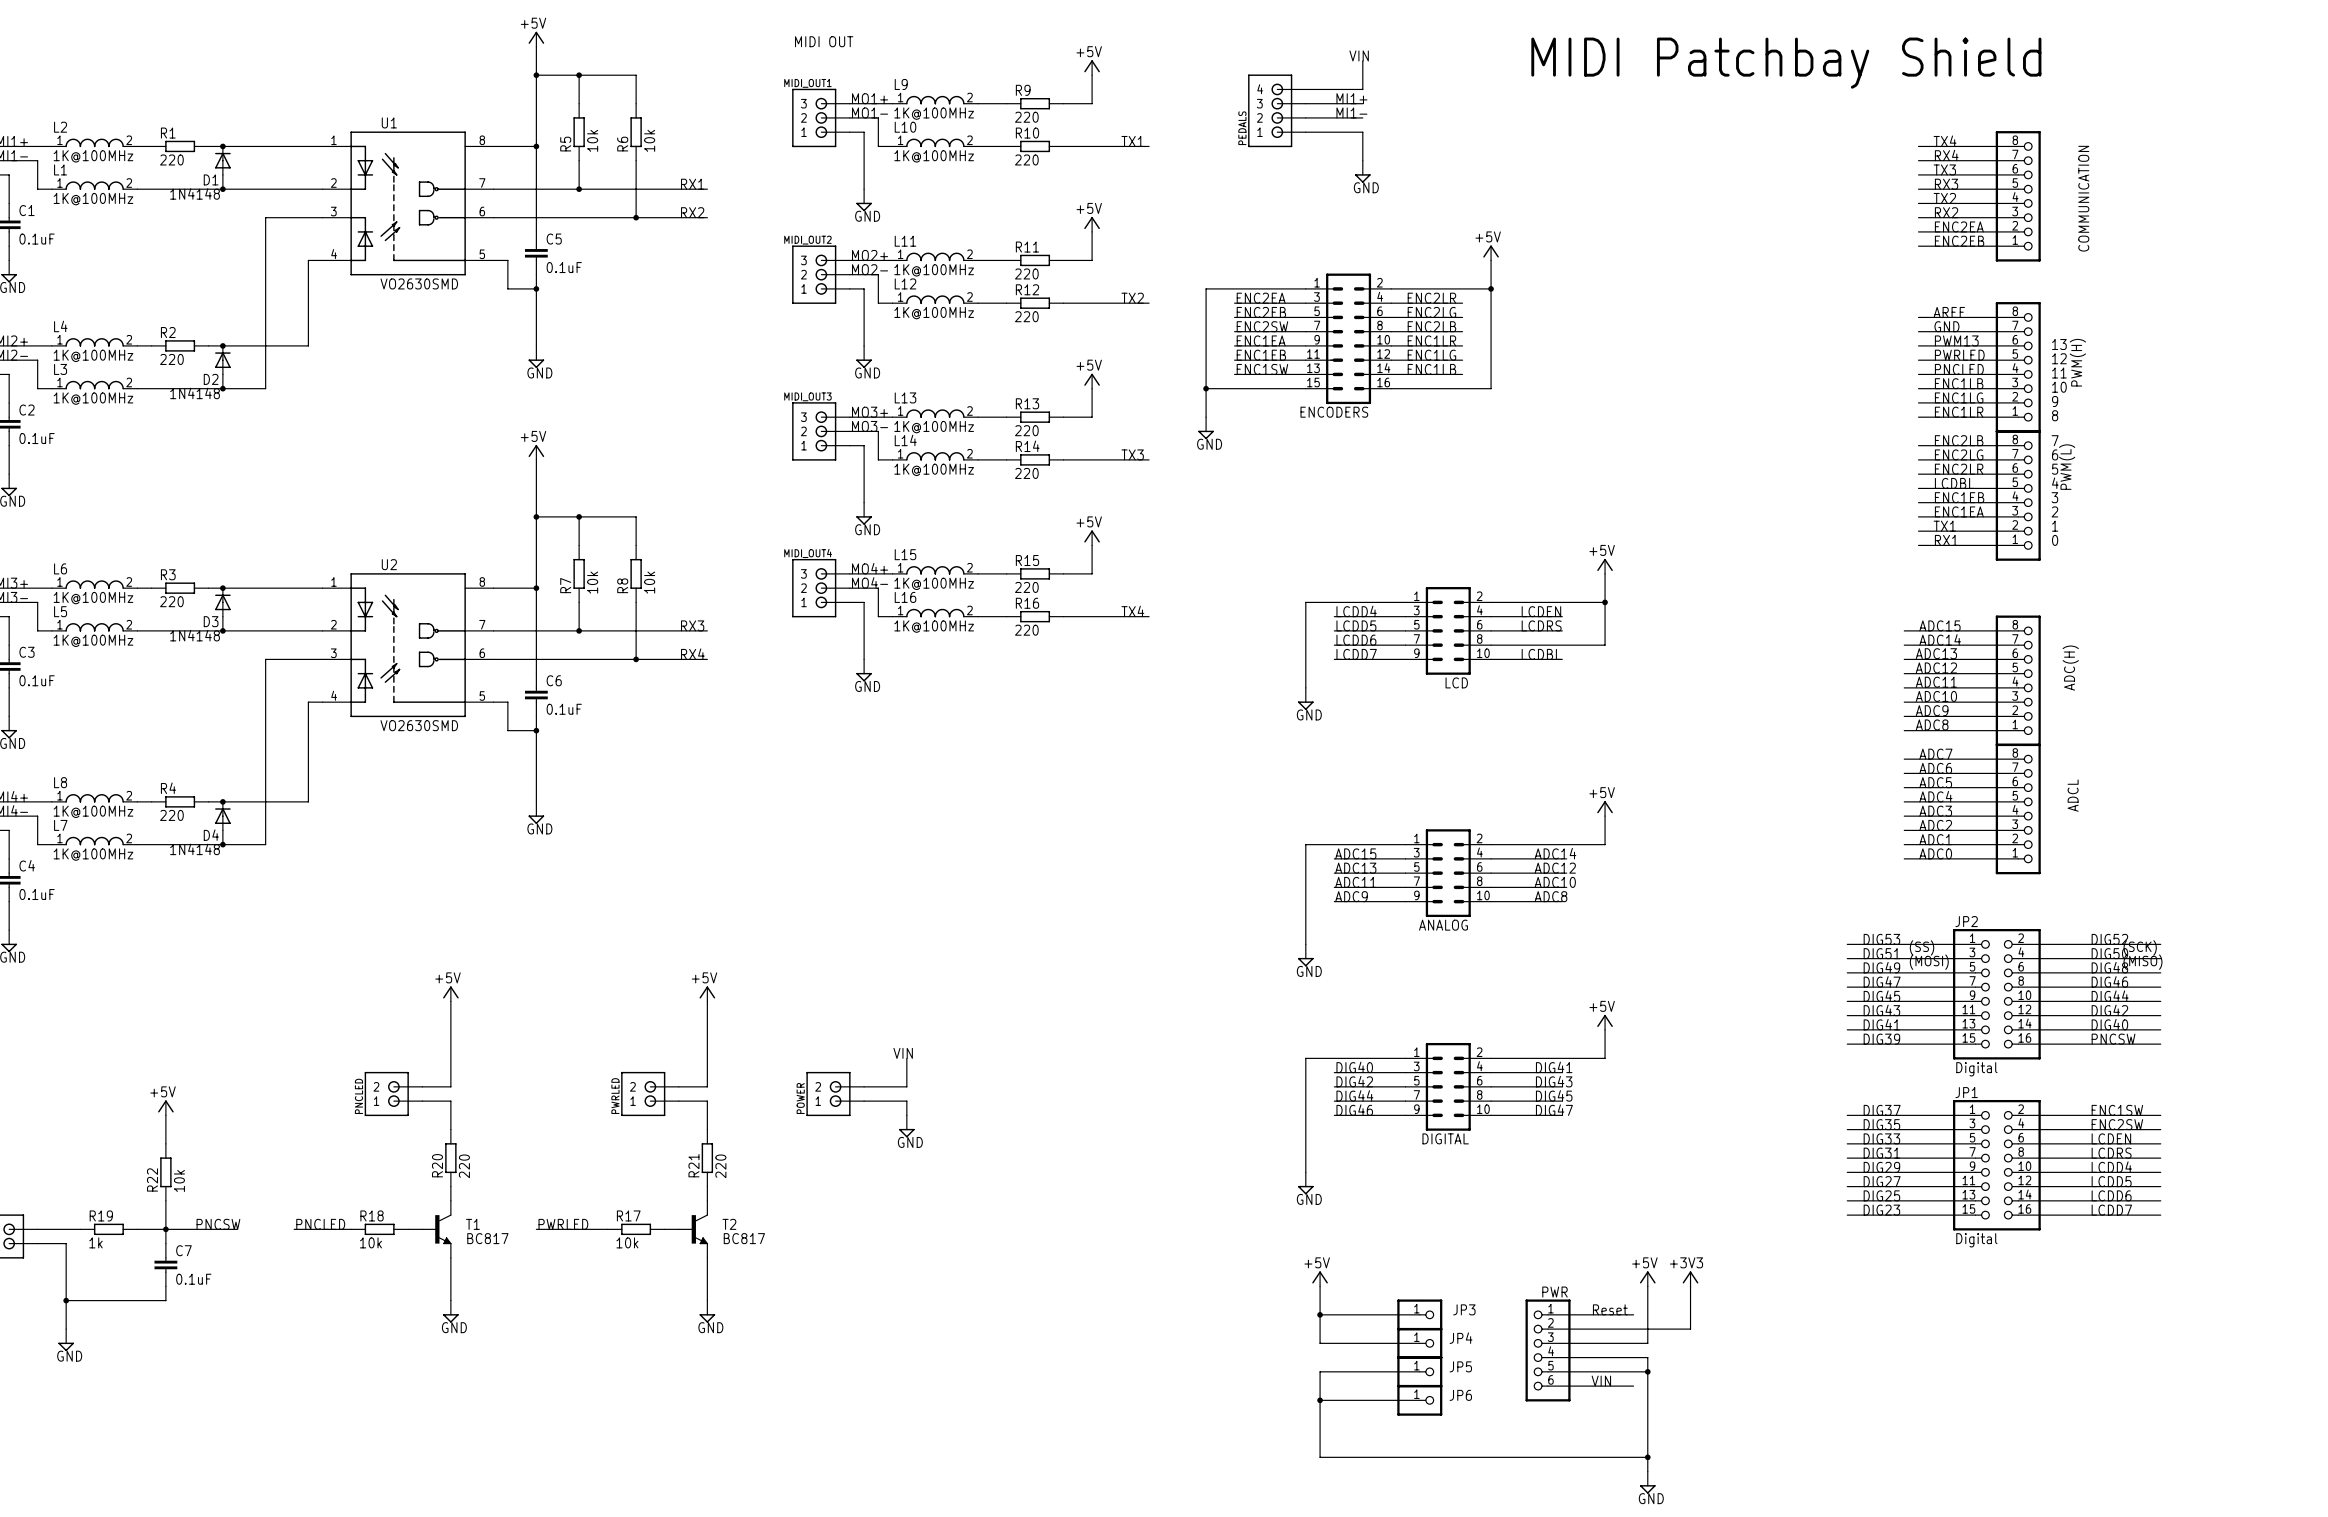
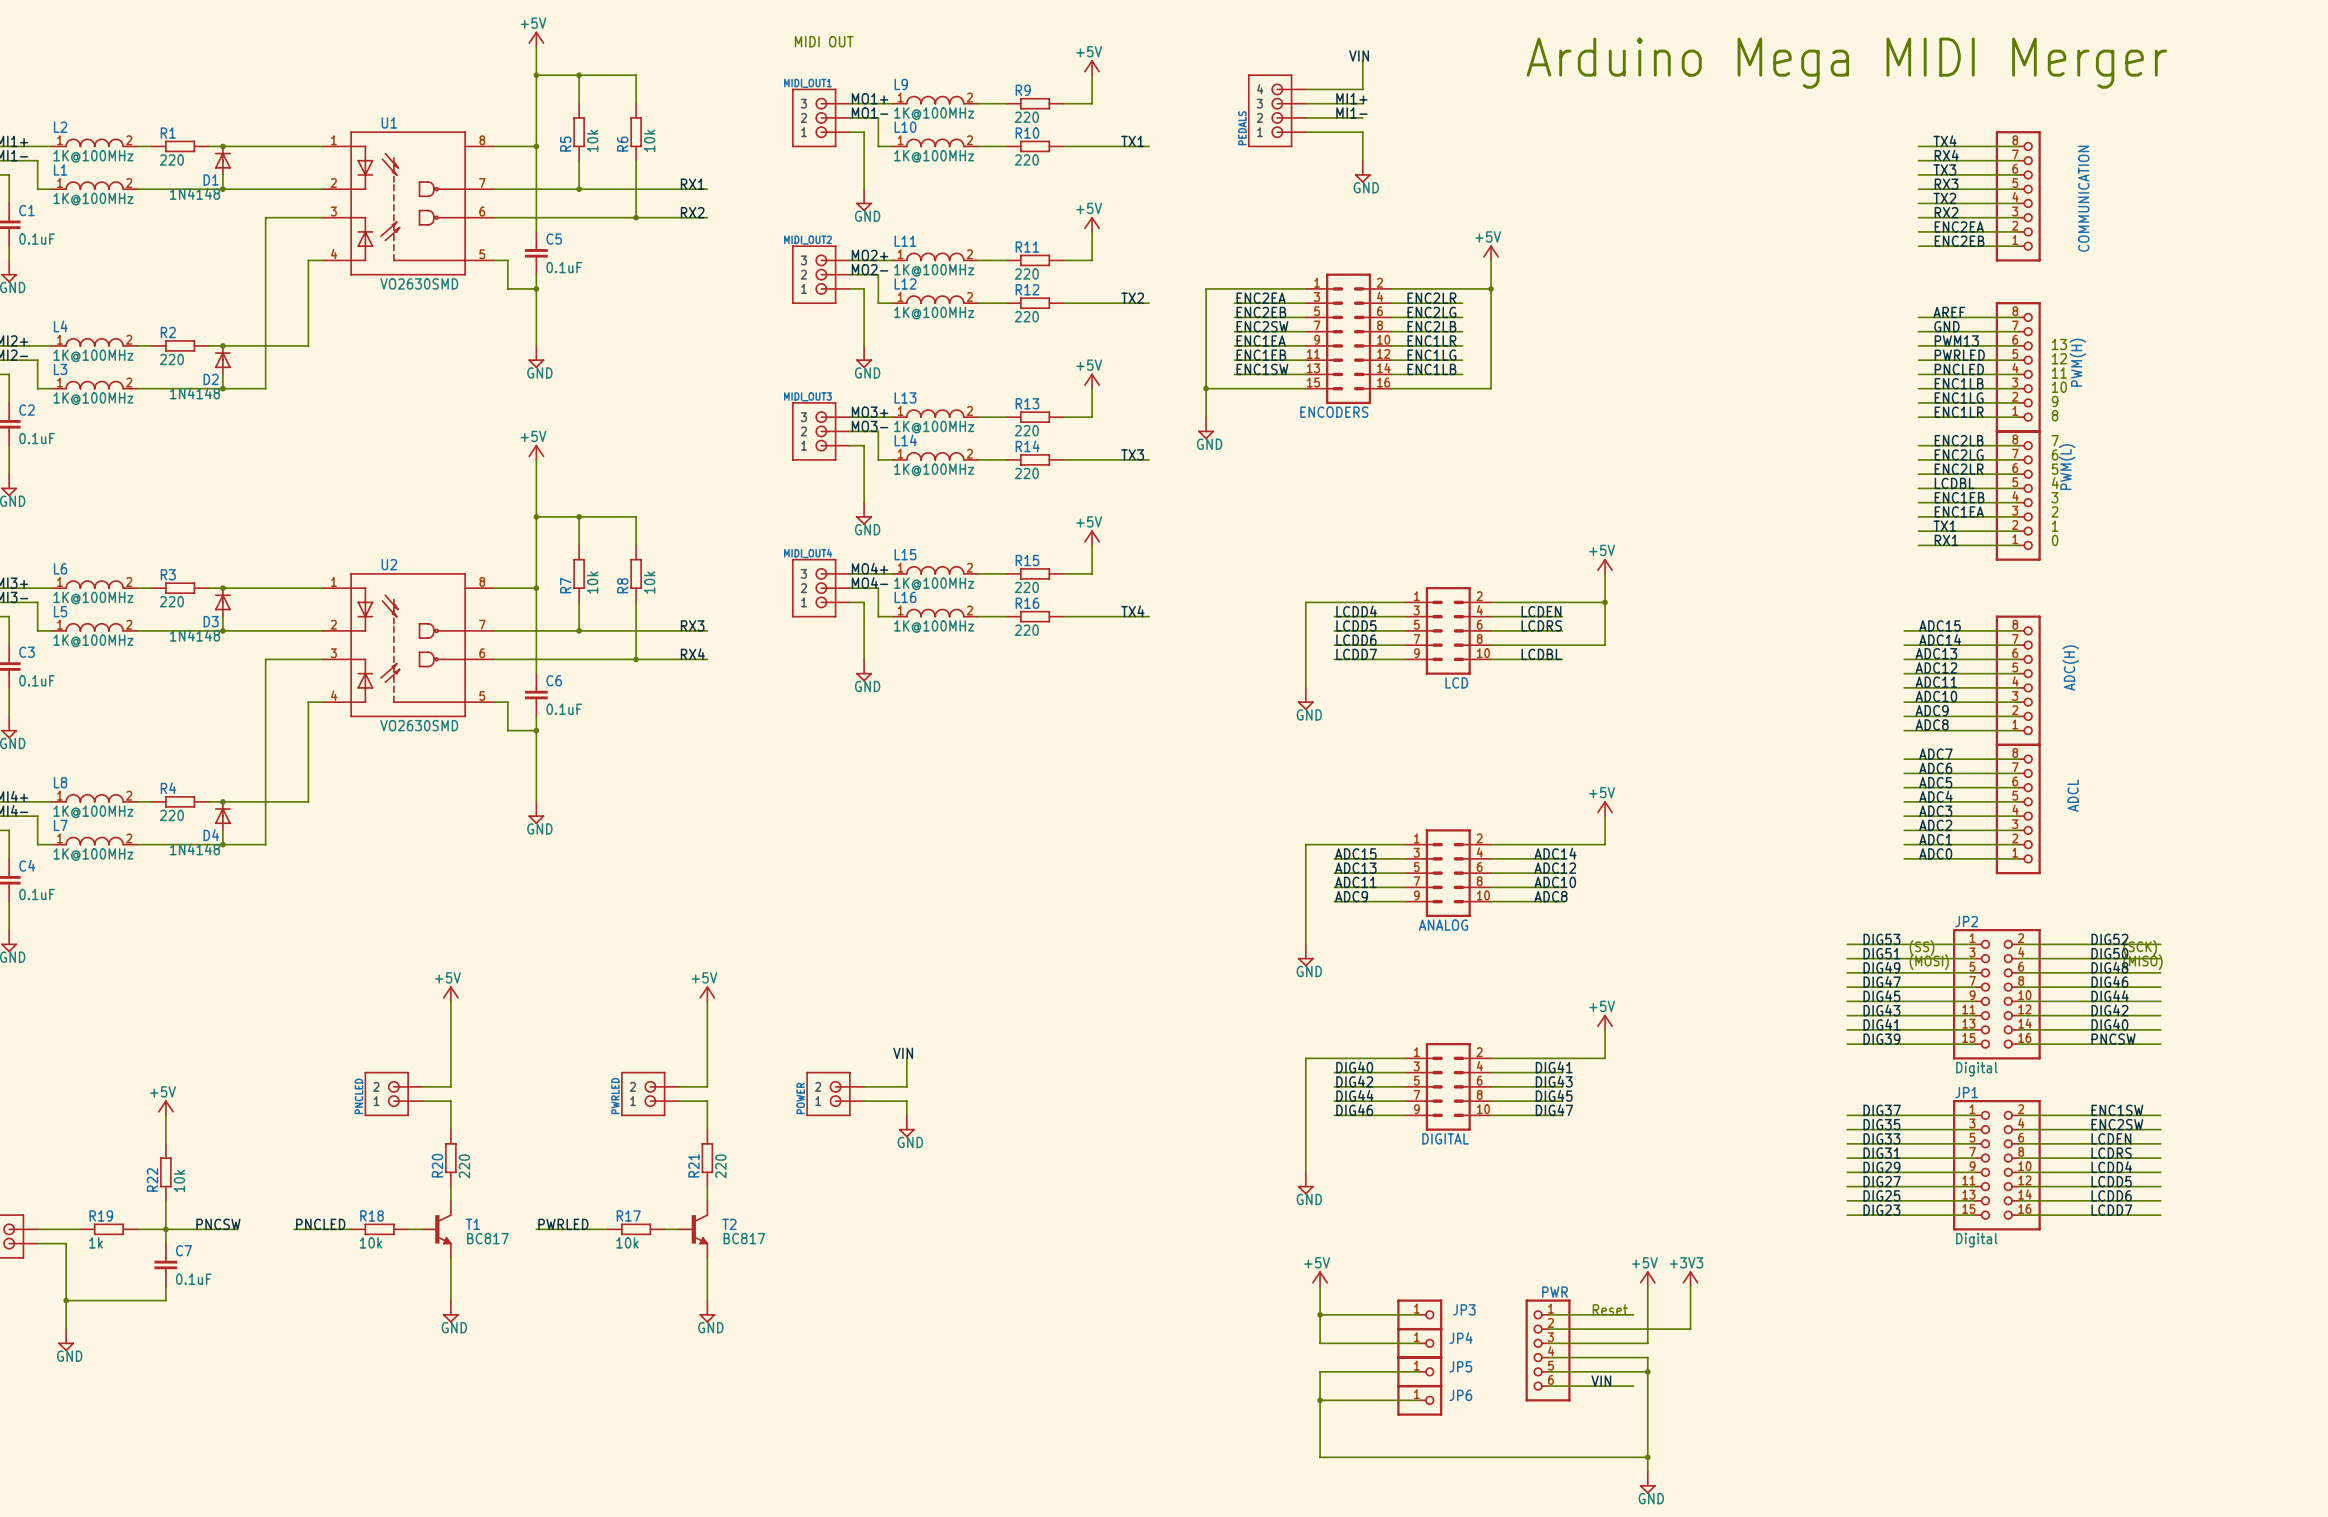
text: MIDI Patchbay Shield (1786, 63) -> Arduino Mega MIDI Merger (1846, 63)

